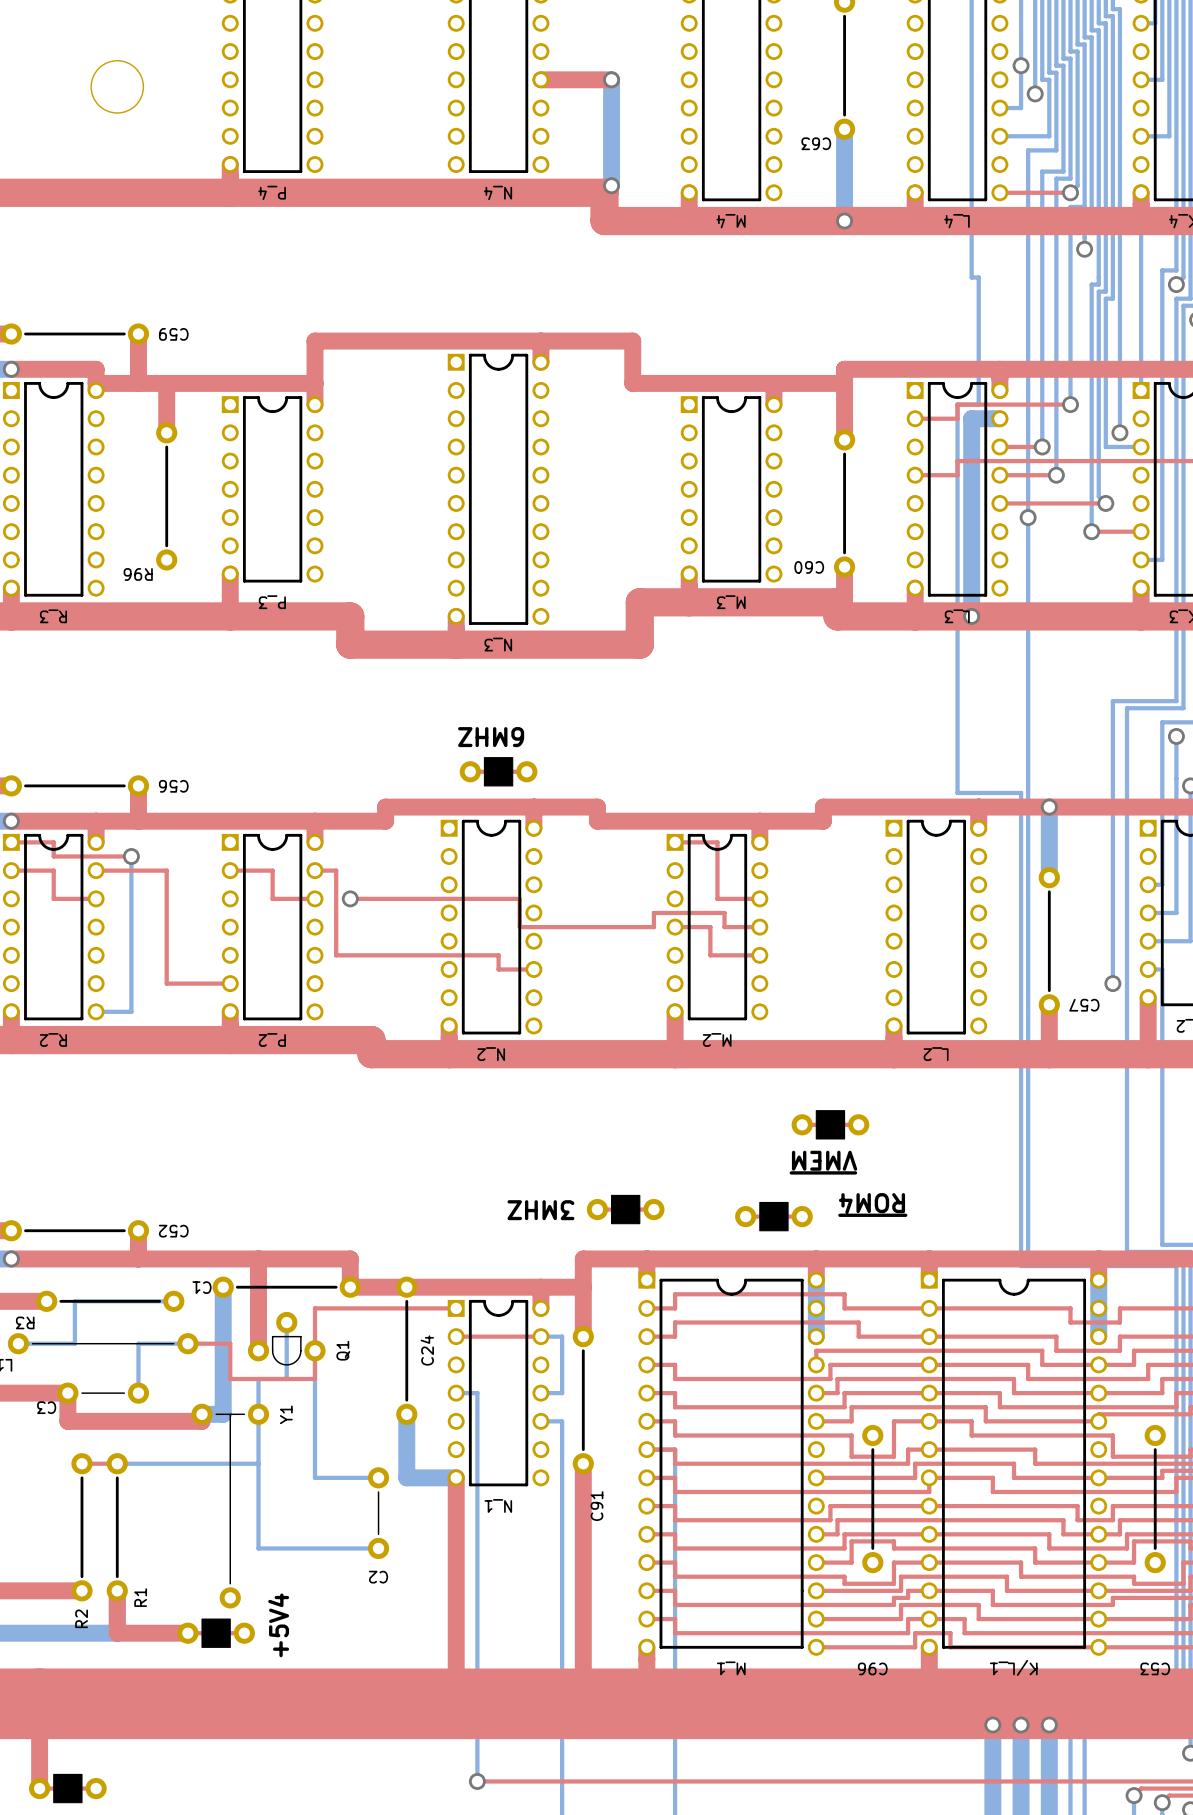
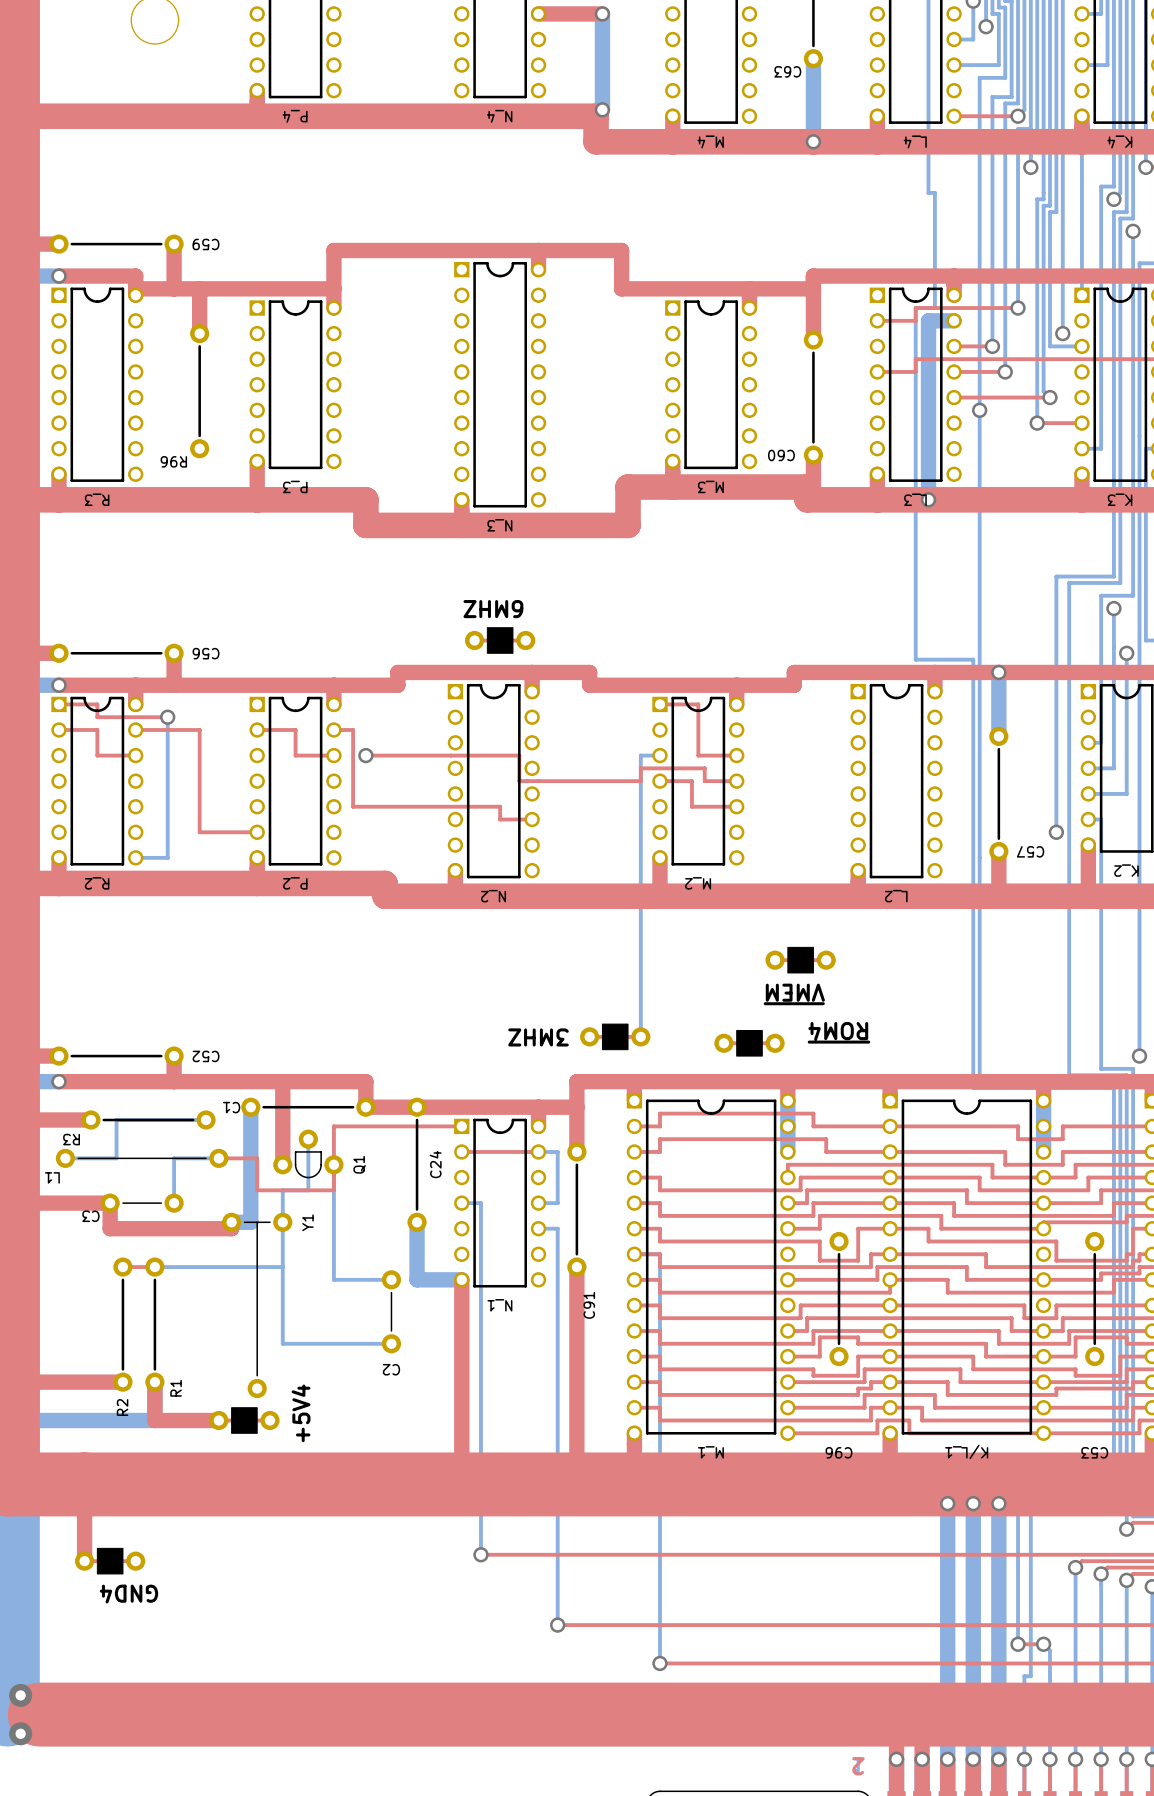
bottom track: none -> (659, 755) (640, 755) (640, 1036)

